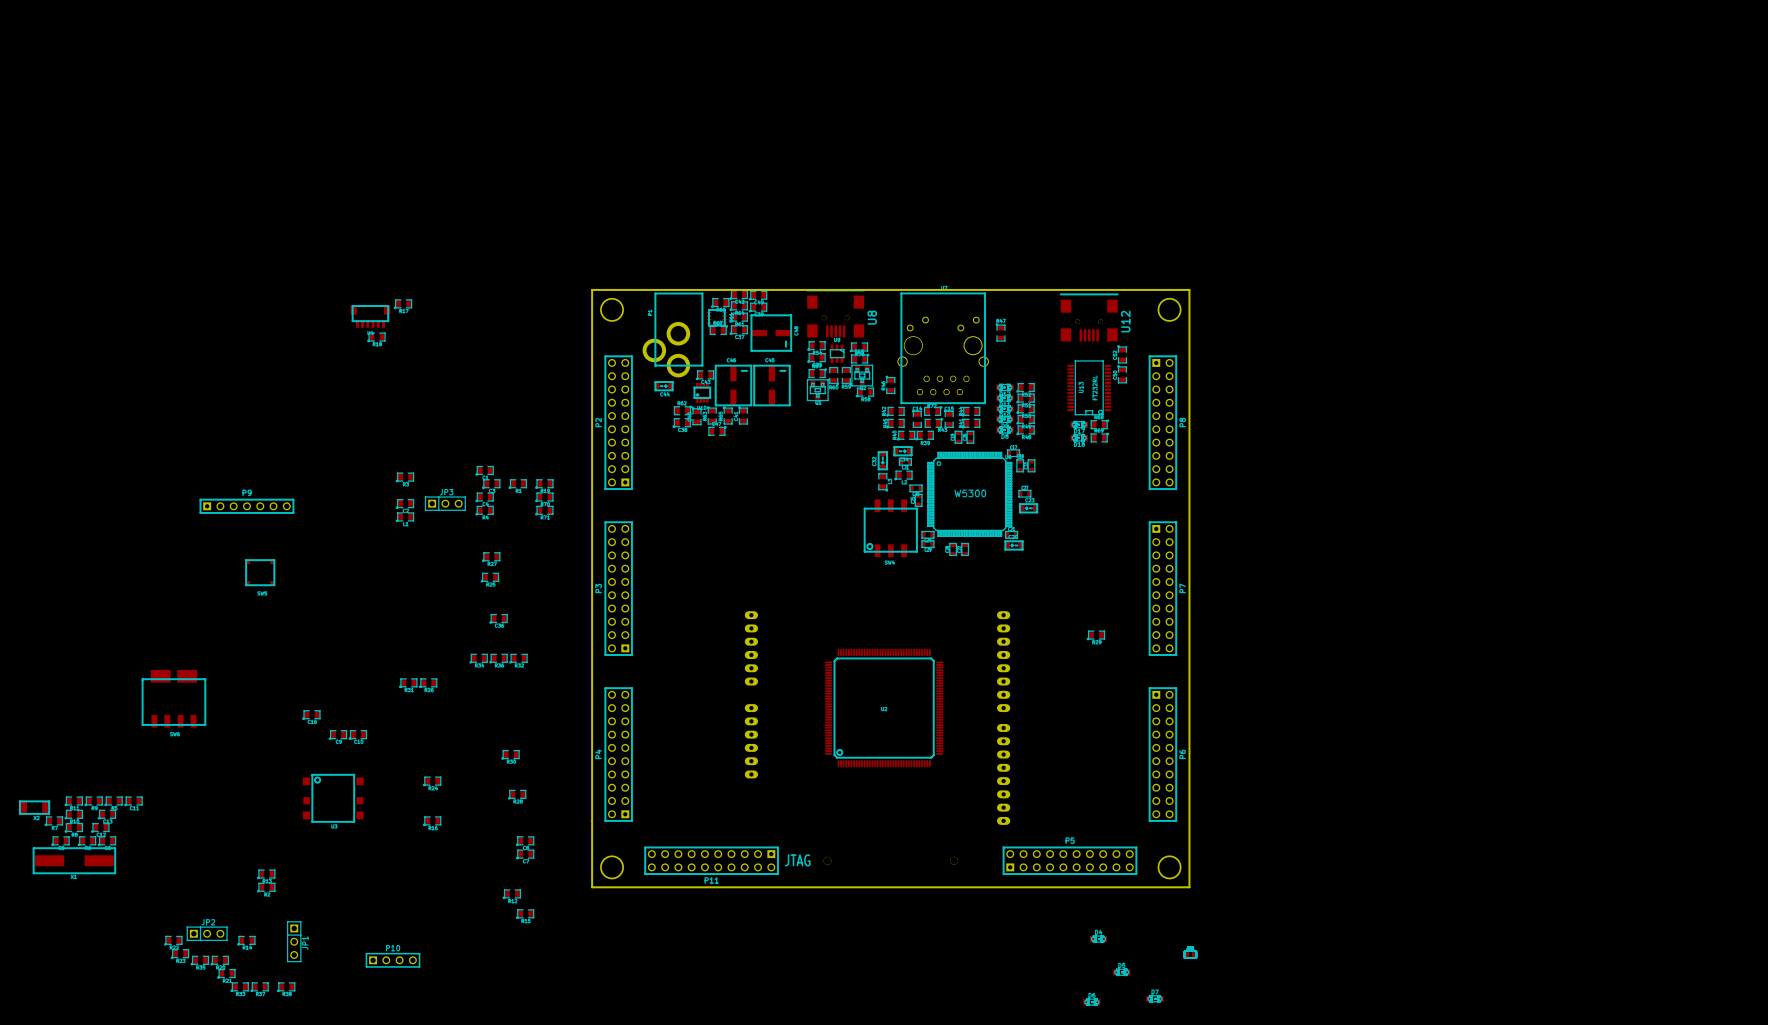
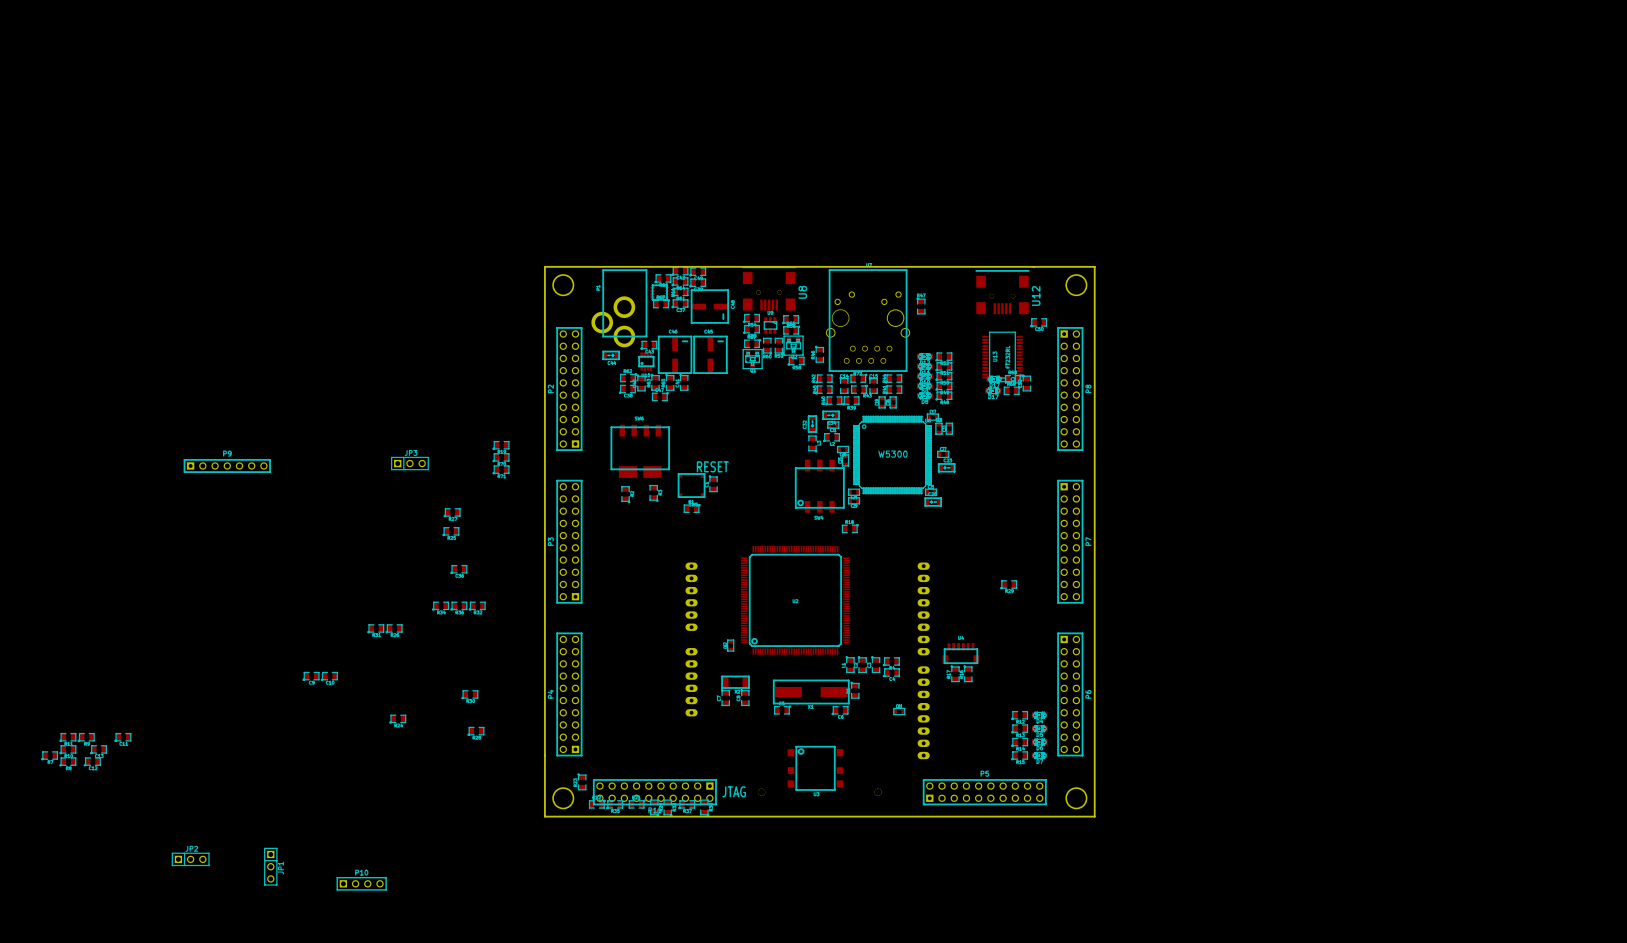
part rotation: 0° (402, 304) -> 90° clockwise (955, 673)
part position: (402, 304) -> (955, 673)
part rotation: 0° (370, 316) -> 180° (960, 653)
part position: (370, 316) -> (960, 653)
part rotation: 0° (376, 337) -> 180° (850, 528)
part position: (376, 337) -> (850, 528)
part position: (1122, 354) -> (1026, 382)
part rotation: 0° (1122, 374) -> 90° counterclockwise (1038, 322)
part position: (1122, 374) -> (1038, 322)
part: none -> (1013, 378)
part: none -> (994, 379)
part: (1079, 437) -> none
part: (1099, 437) -> none
part rotation: 0° (484, 470) -> 90° clockwise (713, 483)
part position: (484, 470) -> (713, 483)
part rotation: 0° (404, 477) -> 90° counterclockwise (653, 493)
part position: (404, 477) -> (653, 493)
part rotation: 0° (491, 484) -> 90° clockwise (875, 664)
part position: (491, 484) -> (875, 664)
part rotation: 0° (517, 484) -> 180° (692, 508)
part position: (517, 484) -> (692, 508)
part position: (484, 497) -> (891, 672)
part rotation: 0° (404, 503) -> 90° clockwise (862, 664)
part position: (404, 503) -> (862, 664)
text: none -> RESET (712, 466)
part position: (484, 510) -> (891, 661)
part rotation: 0° (404, 517) -> 90° clockwise (850, 664)
part position: (404, 517) -> (850, 664)
part: (953, 549) -> none
part: (965, 549) -> none
part position: (260, 572) -> (691, 485)
part rotation: 0° (173, 698) -> 180° (640, 451)
part position: (173, 698) -> (640, 451)
part position: (884, 708) -> (795, 600)
part: (311, 715) -> none
part position: (333, 798) -> (815, 768)
part: (113, 801) -> none
part position: (34, 807) -> (735, 682)
part rotation: 0° (432, 821) -> 90° clockwise (967, 673)
part position: (432, 821) -> (967, 673)
part rotation: 0° (60, 841) -> 180° (782, 710)
part position: (60, 841) -> (782, 710)
part rotation: 0° (87, 841) -> 90° clockwise (854, 690)
part position: (87, 841) -> (854, 690)
part position: (106, 841) -> (839, 710)
part rotation: 0° (525, 841) -> 90° clockwise (745, 697)
part position: (525, 841) -> (745, 697)
part rotation: 0° (525, 854) -> 90° clockwise (725, 697)
part position: (525, 854) -> (725, 697)
part position: (74, 860) -> (811, 692)
part position: (266, 874) -> (1019, 728)
part rotation: 0° (266, 887) -> 90° counterclockwise (625, 494)
part position: (266, 887) -> (625, 494)
part position: (511, 894) -> (1019, 715)
part position: (525, 914) -> (1019, 755)
part rotation: 0° (1098, 939) -> 180° (1039, 715)
part position: (1098, 939) -> (1039, 715)
part rotation: 0° (173, 940) -> 180° (597, 804)
part position: (173, 940) -> (597, 804)
part position: (246, 940) -> (1019, 742)
part rotation: 0° (179, 954) -> 90° clockwise (581, 781)
part position: (179, 954) -> (581, 781)
part rotation: 0° (1190, 954) -> 90° clockwise (730, 645)
part position: (1190, 954) -> (730, 645)
part position: (1190, 954) -> (899, 711)
part: (1190, 954) -> none
part: (1190, 954) -> none
part: (1190, 954) -> none
part: (1190, 954) -> none
part: (1190, 954) -> none
part: (1190, 954) -> none
part: (1190, 954) -> none
part: (1190, 954) -> none
part: (1190, 954) -> none
part position: (199, 960) -> (614, 804)
part rotation: 0° (219, 960) -> 90° counterclockwise (654, 808)
part position: (219, 960) -> (654, 808)
part rotation: 0° (1121, 972) -> 180° (1039, 728)
part position: (1121, 972) -> (1039, 728)
part rotation: 0° (226, 973) -> 180° (637, 804)
part position: (226, 973) -> (637, 804)
part rotation: 0° (239, 987) -> 90° counterclockwise (668, 808)
part position: (239, 987) -> (668, 808)
part position: (259, 987) -> (686, 804)
part rotation: 0° (286, 987) -> 90° counterclockwise (704, 808)
part position: (286, 987) -> (704, 808)
part rotation: 0° (1154, 998) -> 180° (1039, 755)
part position: (1154, 998) -> (1039, 755)
part rotation: 0° (1091, 1002) -> 180° (1039, 742)
part position: (1091, 1002) -> (1039, 742)

